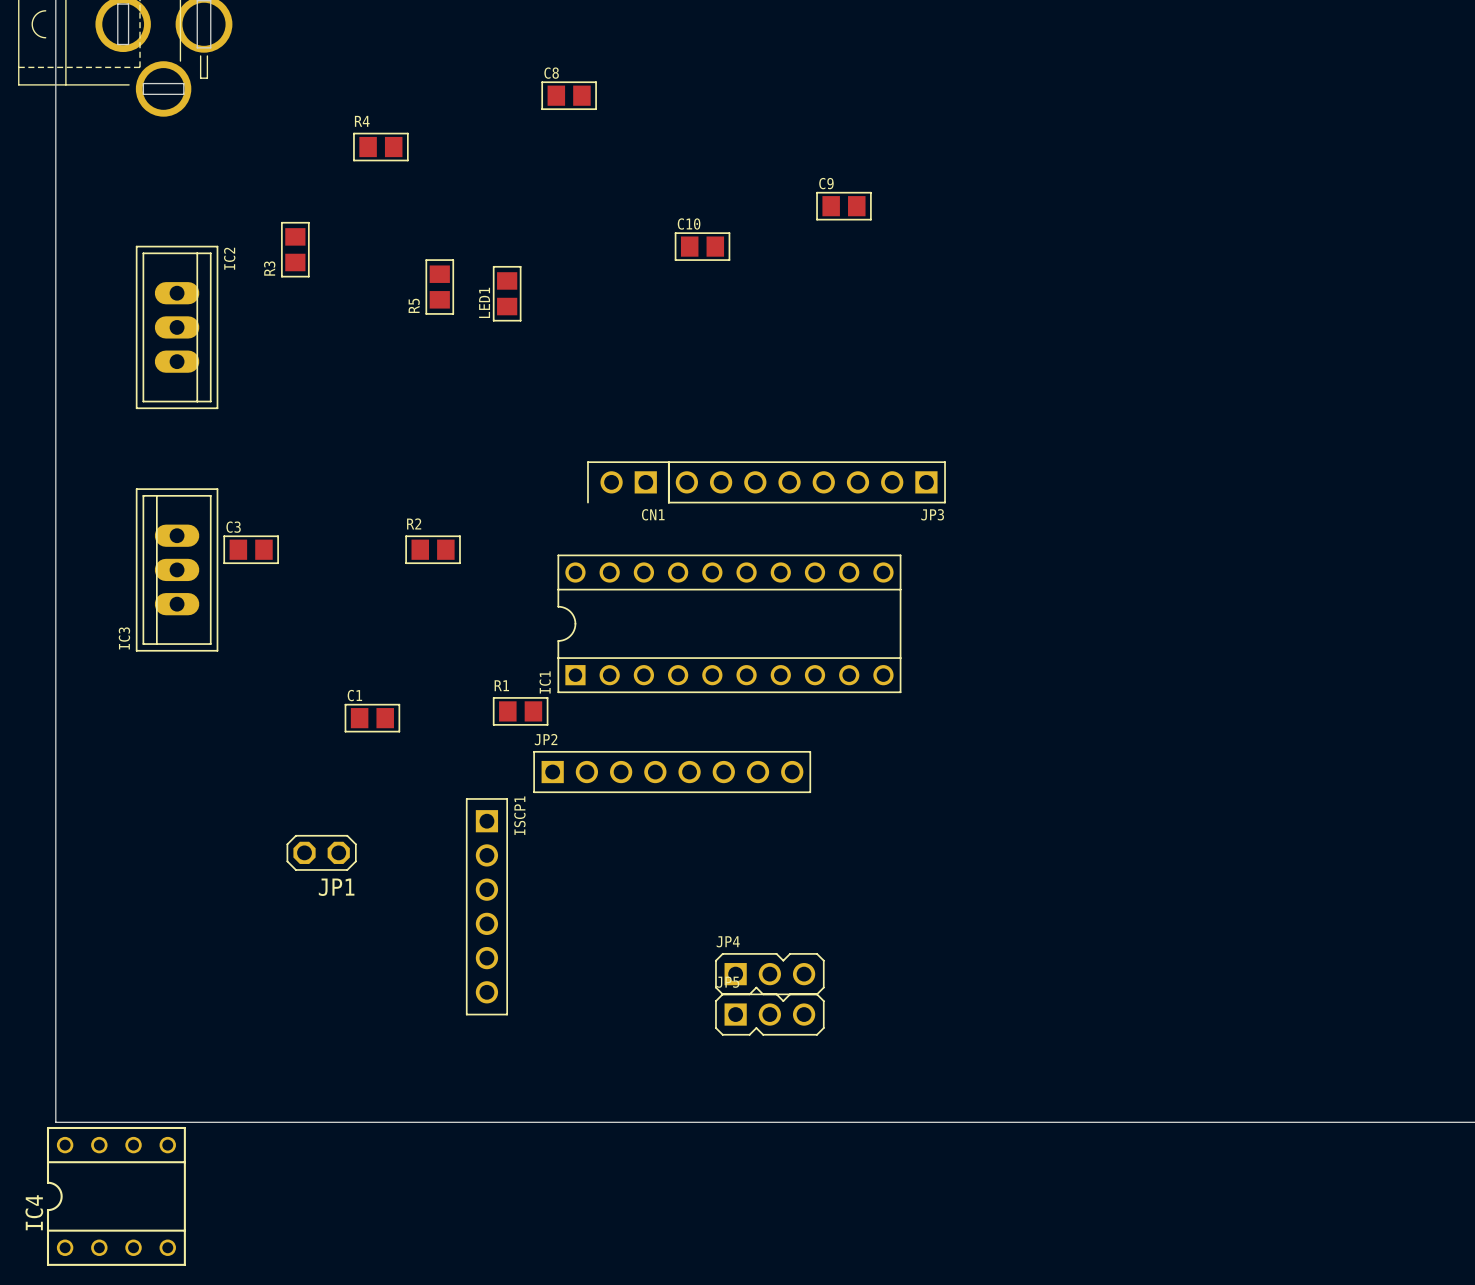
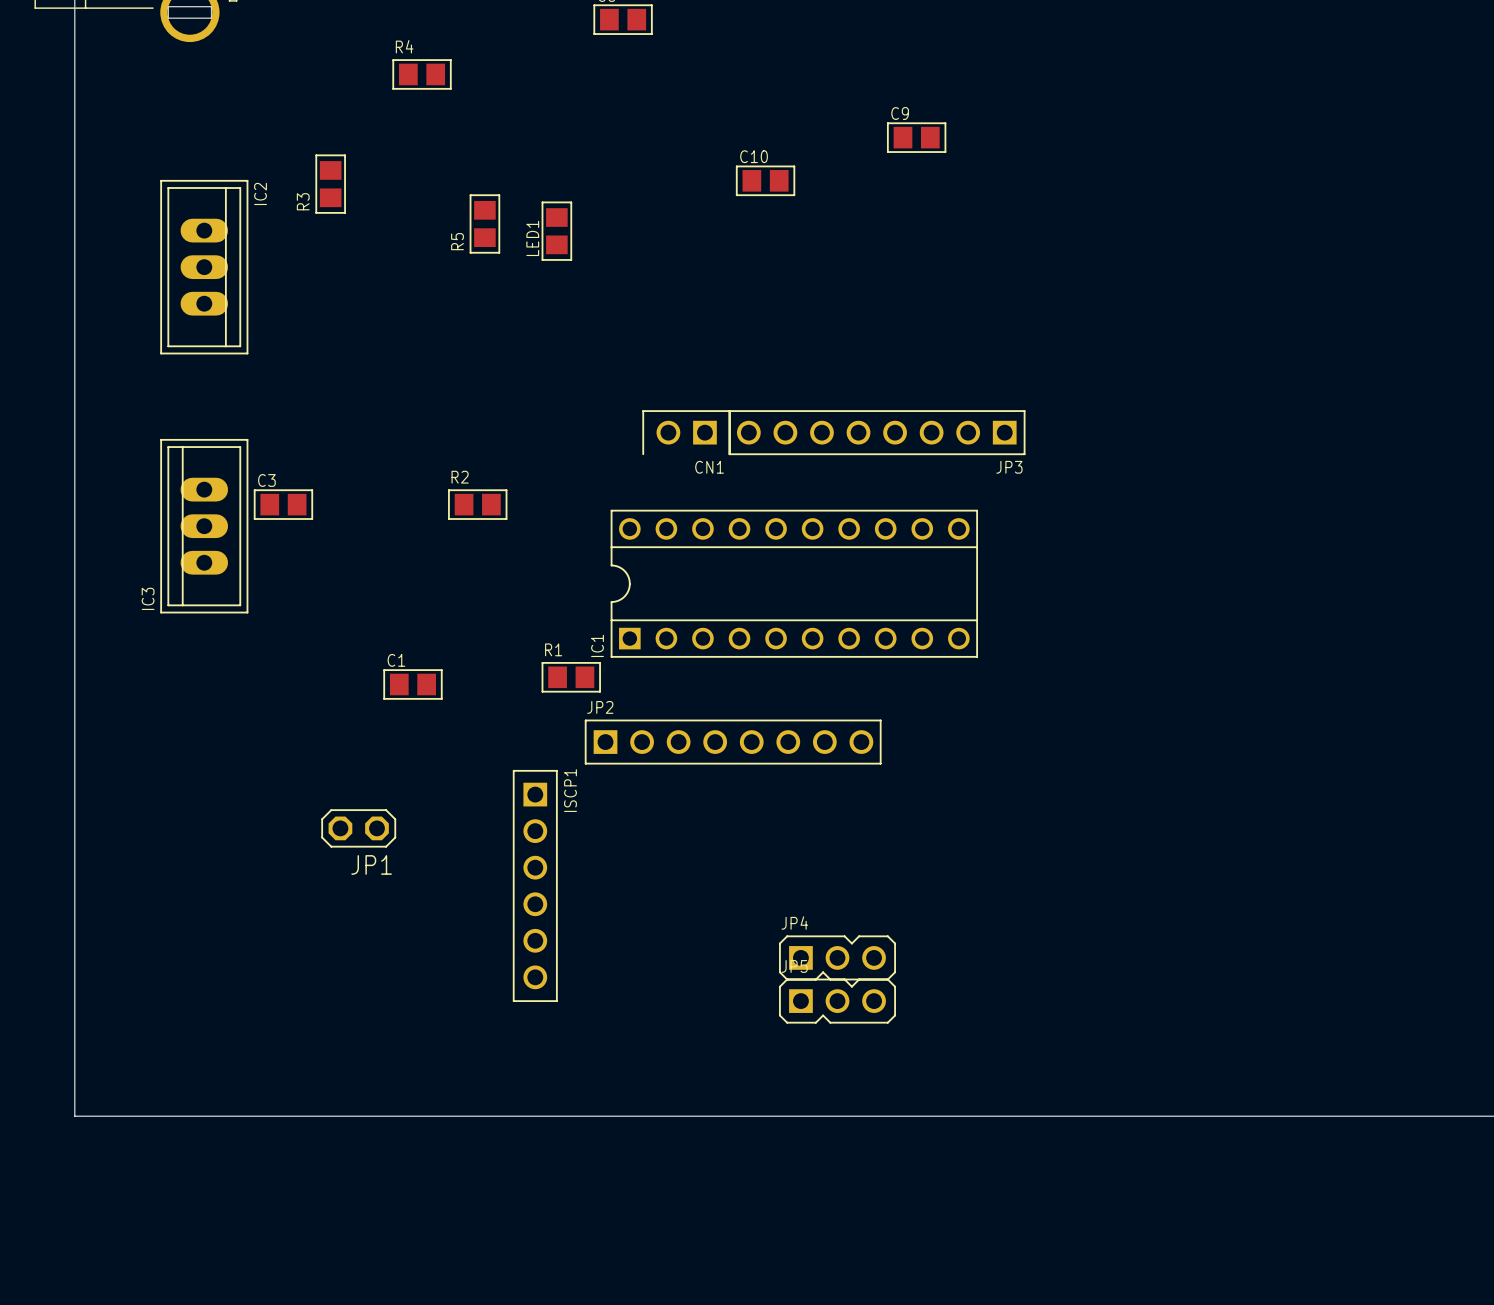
IC4: (116, 1196) -> none

